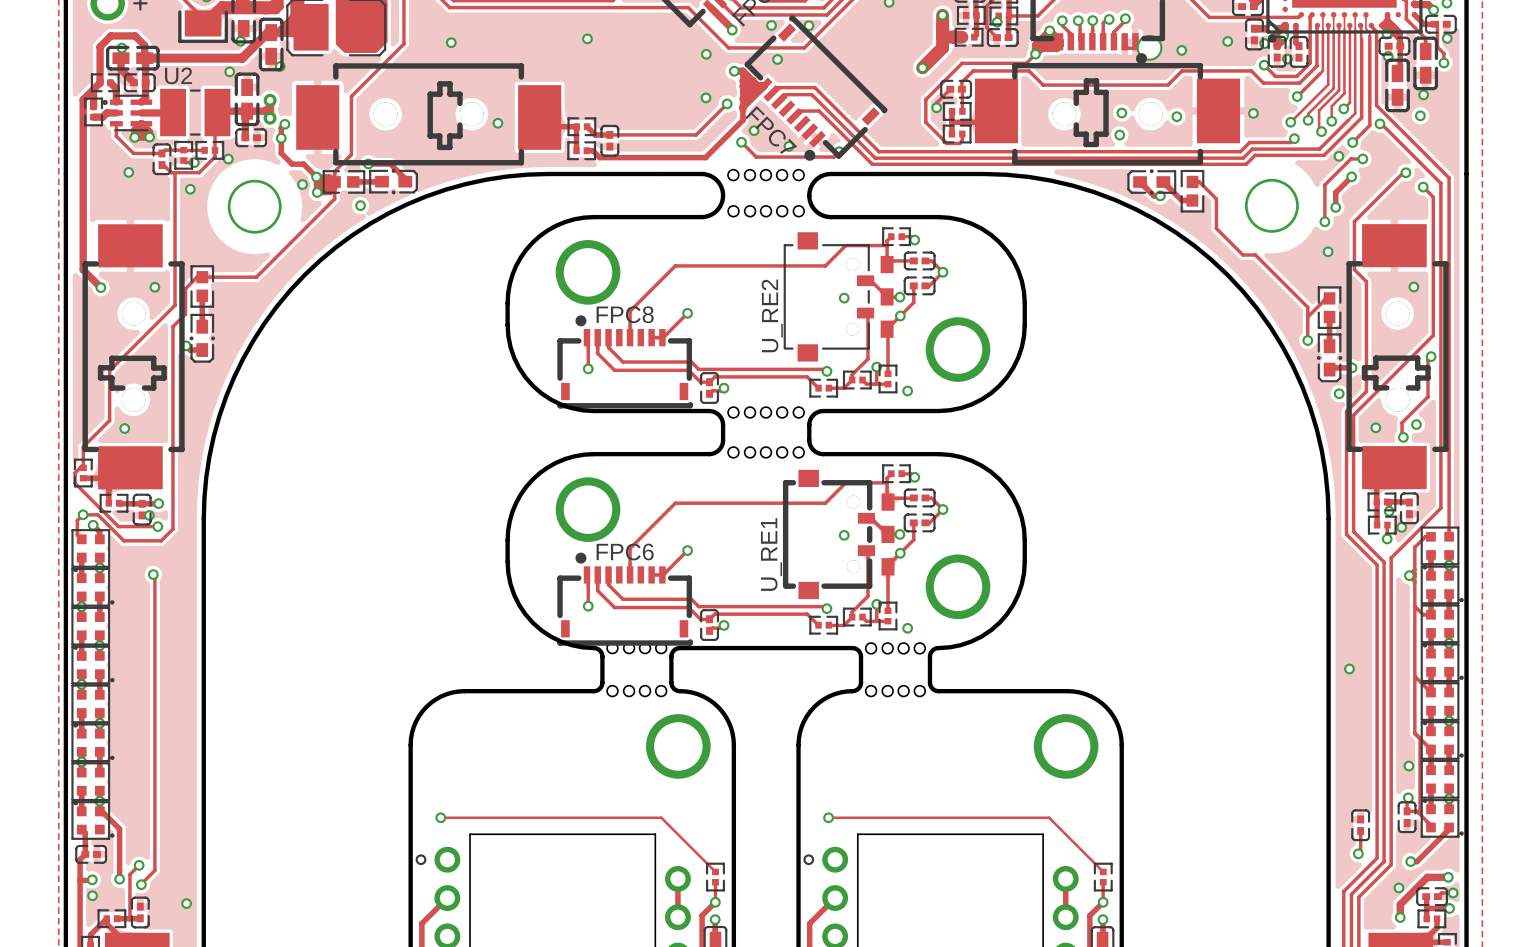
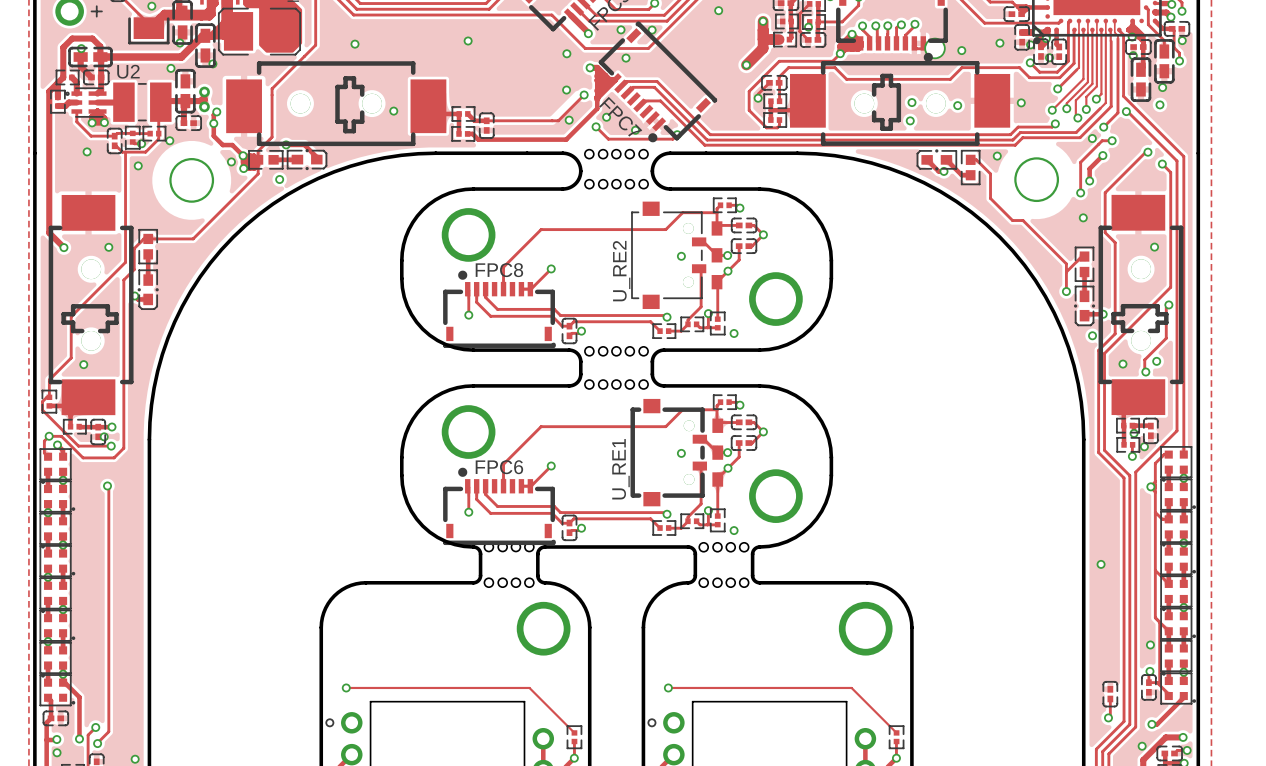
via: none -> (569, 120)
via: none -> (997, 156)

